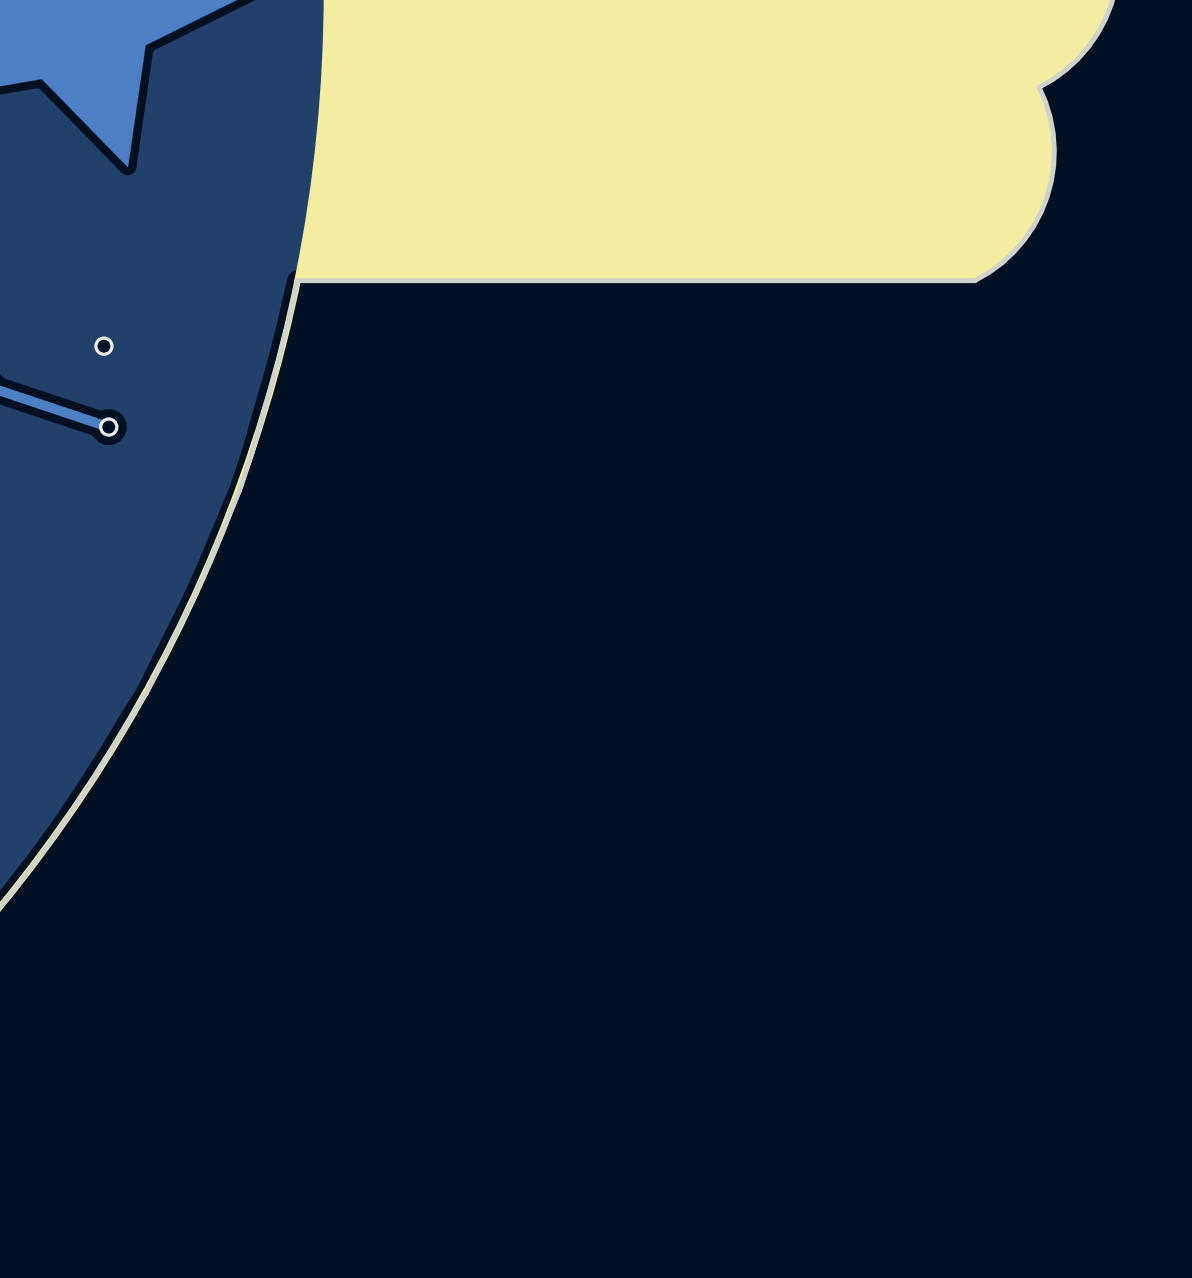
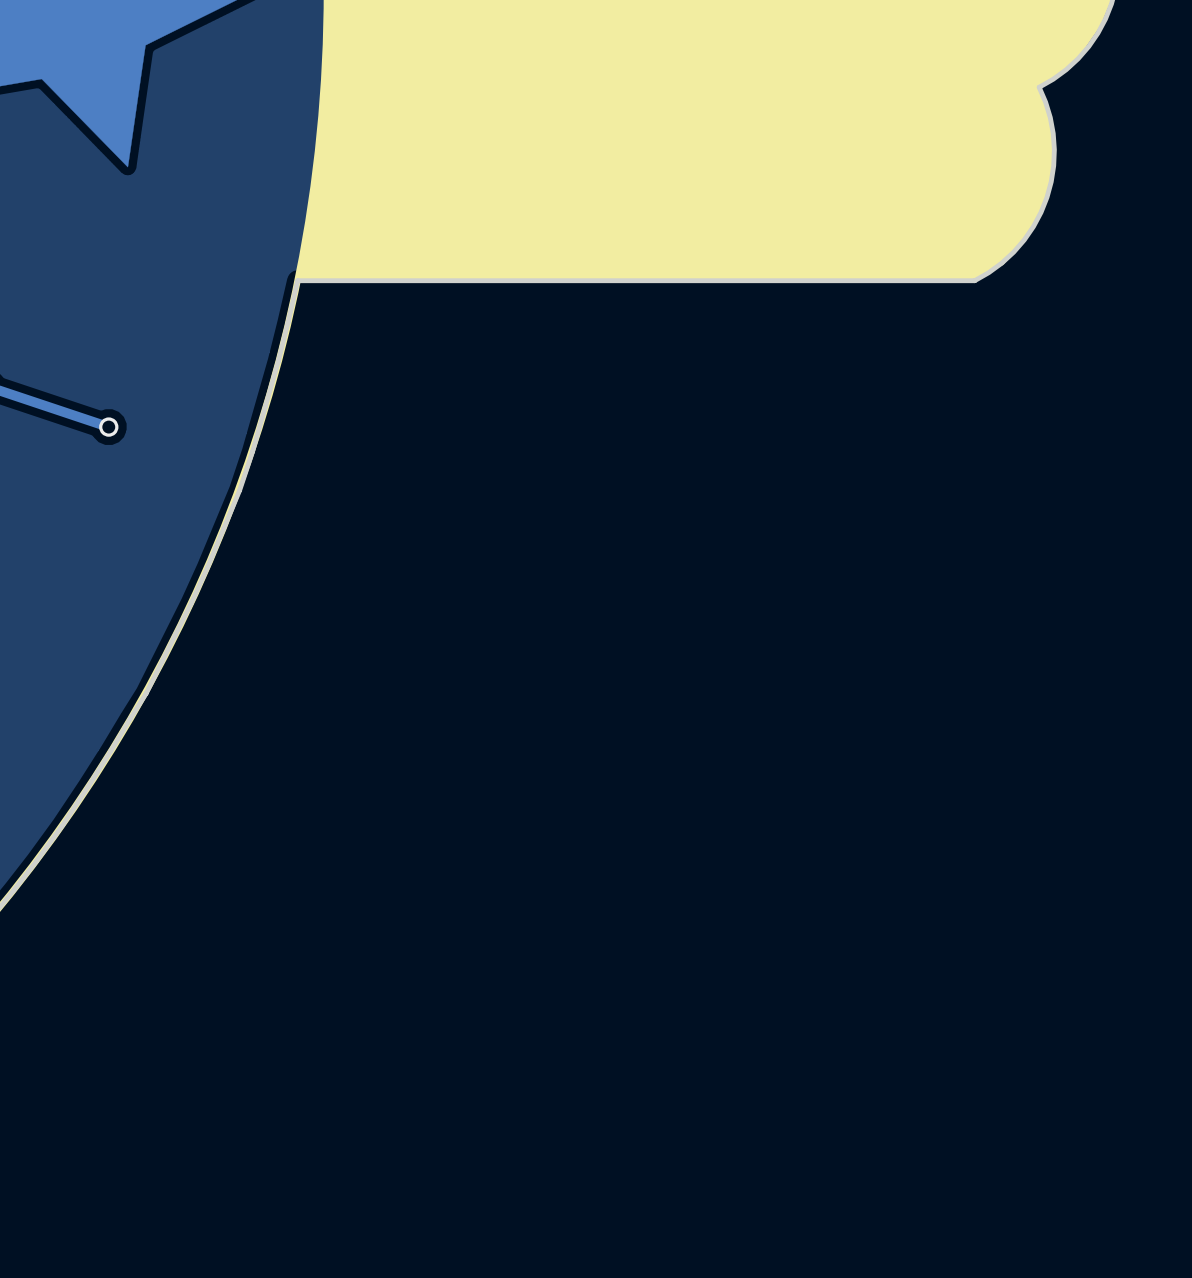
via: (103, 346) -> none

